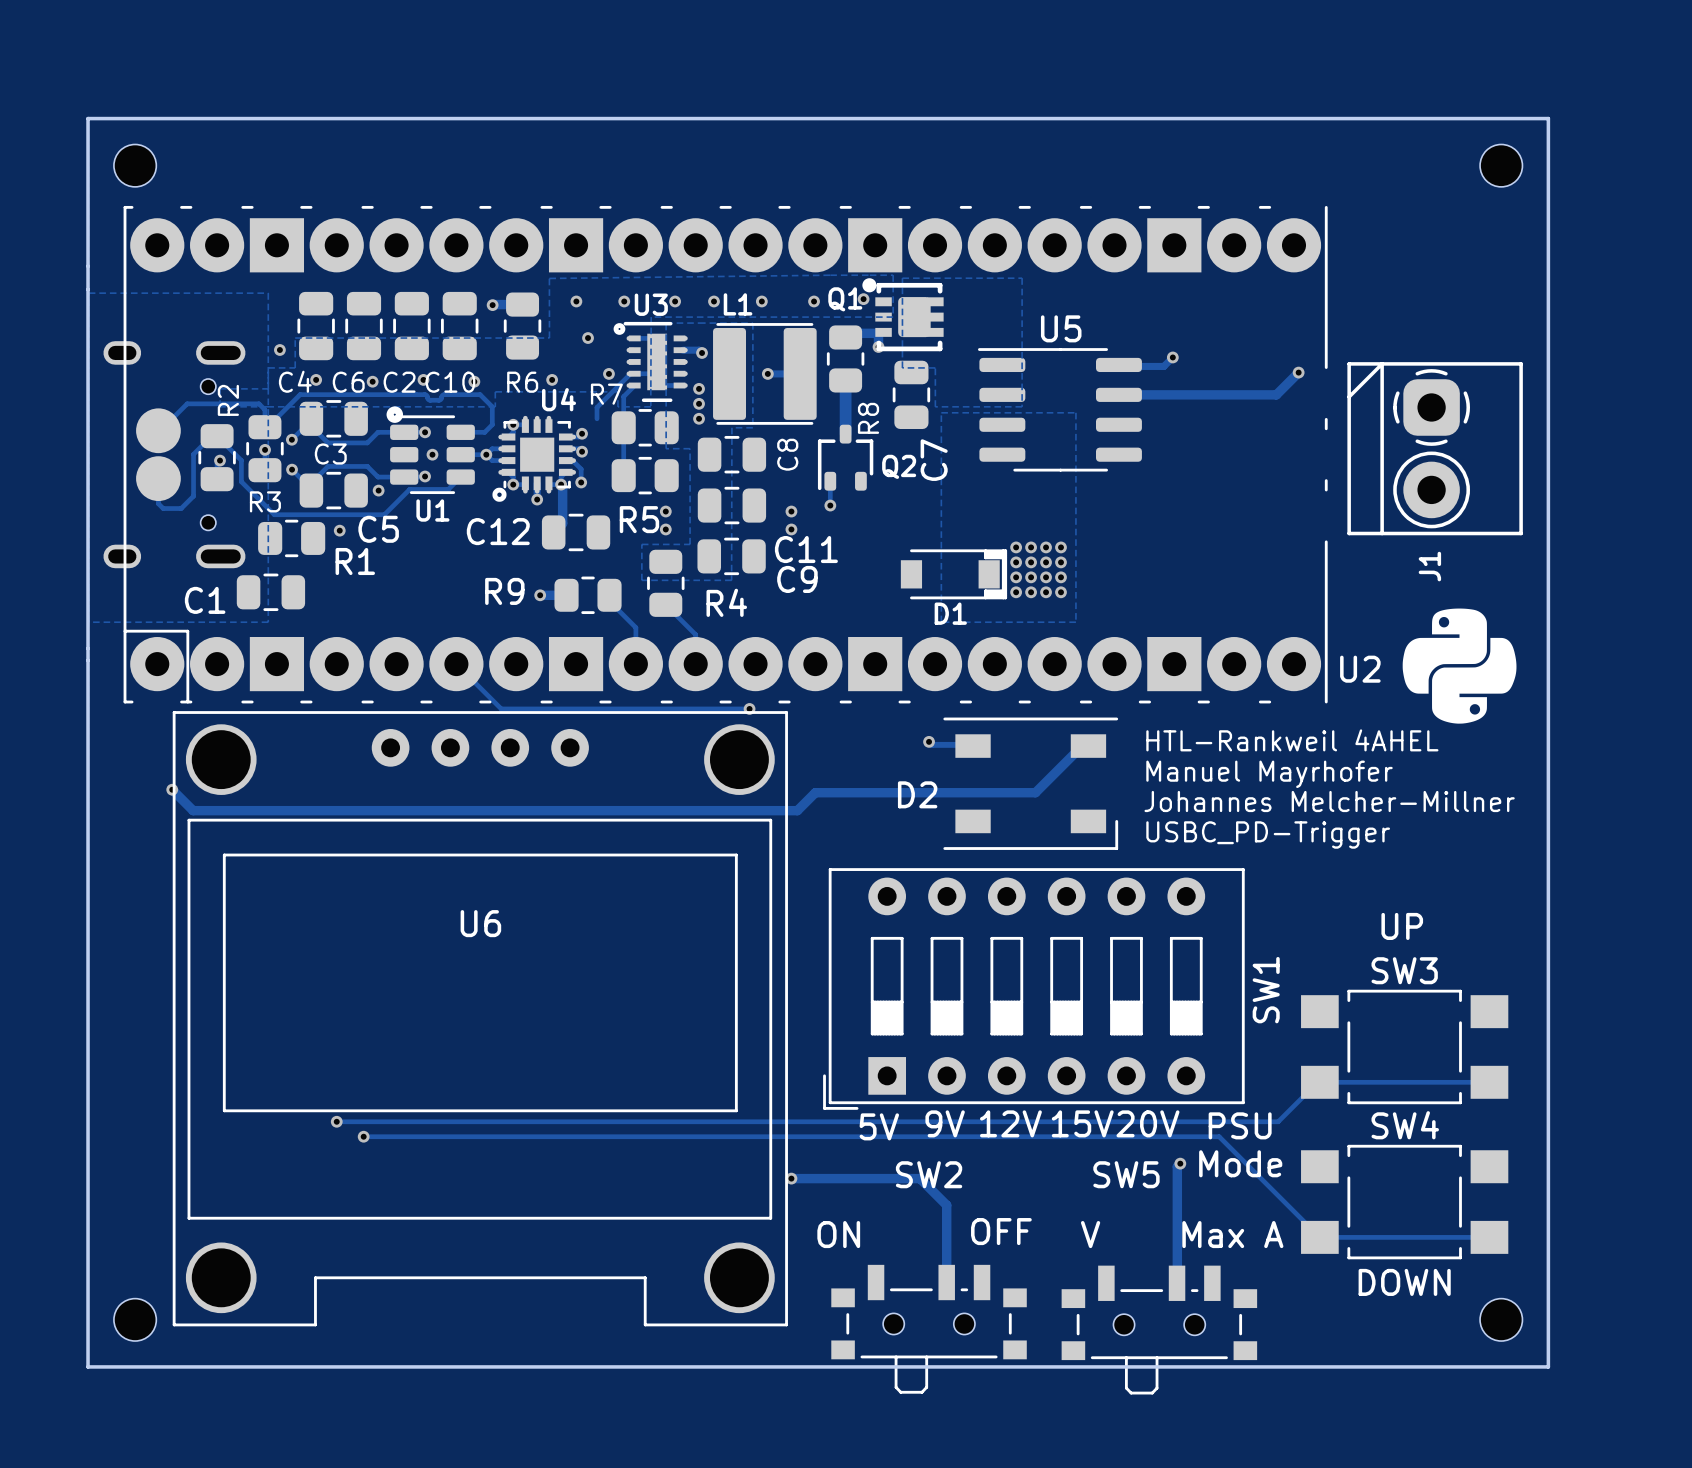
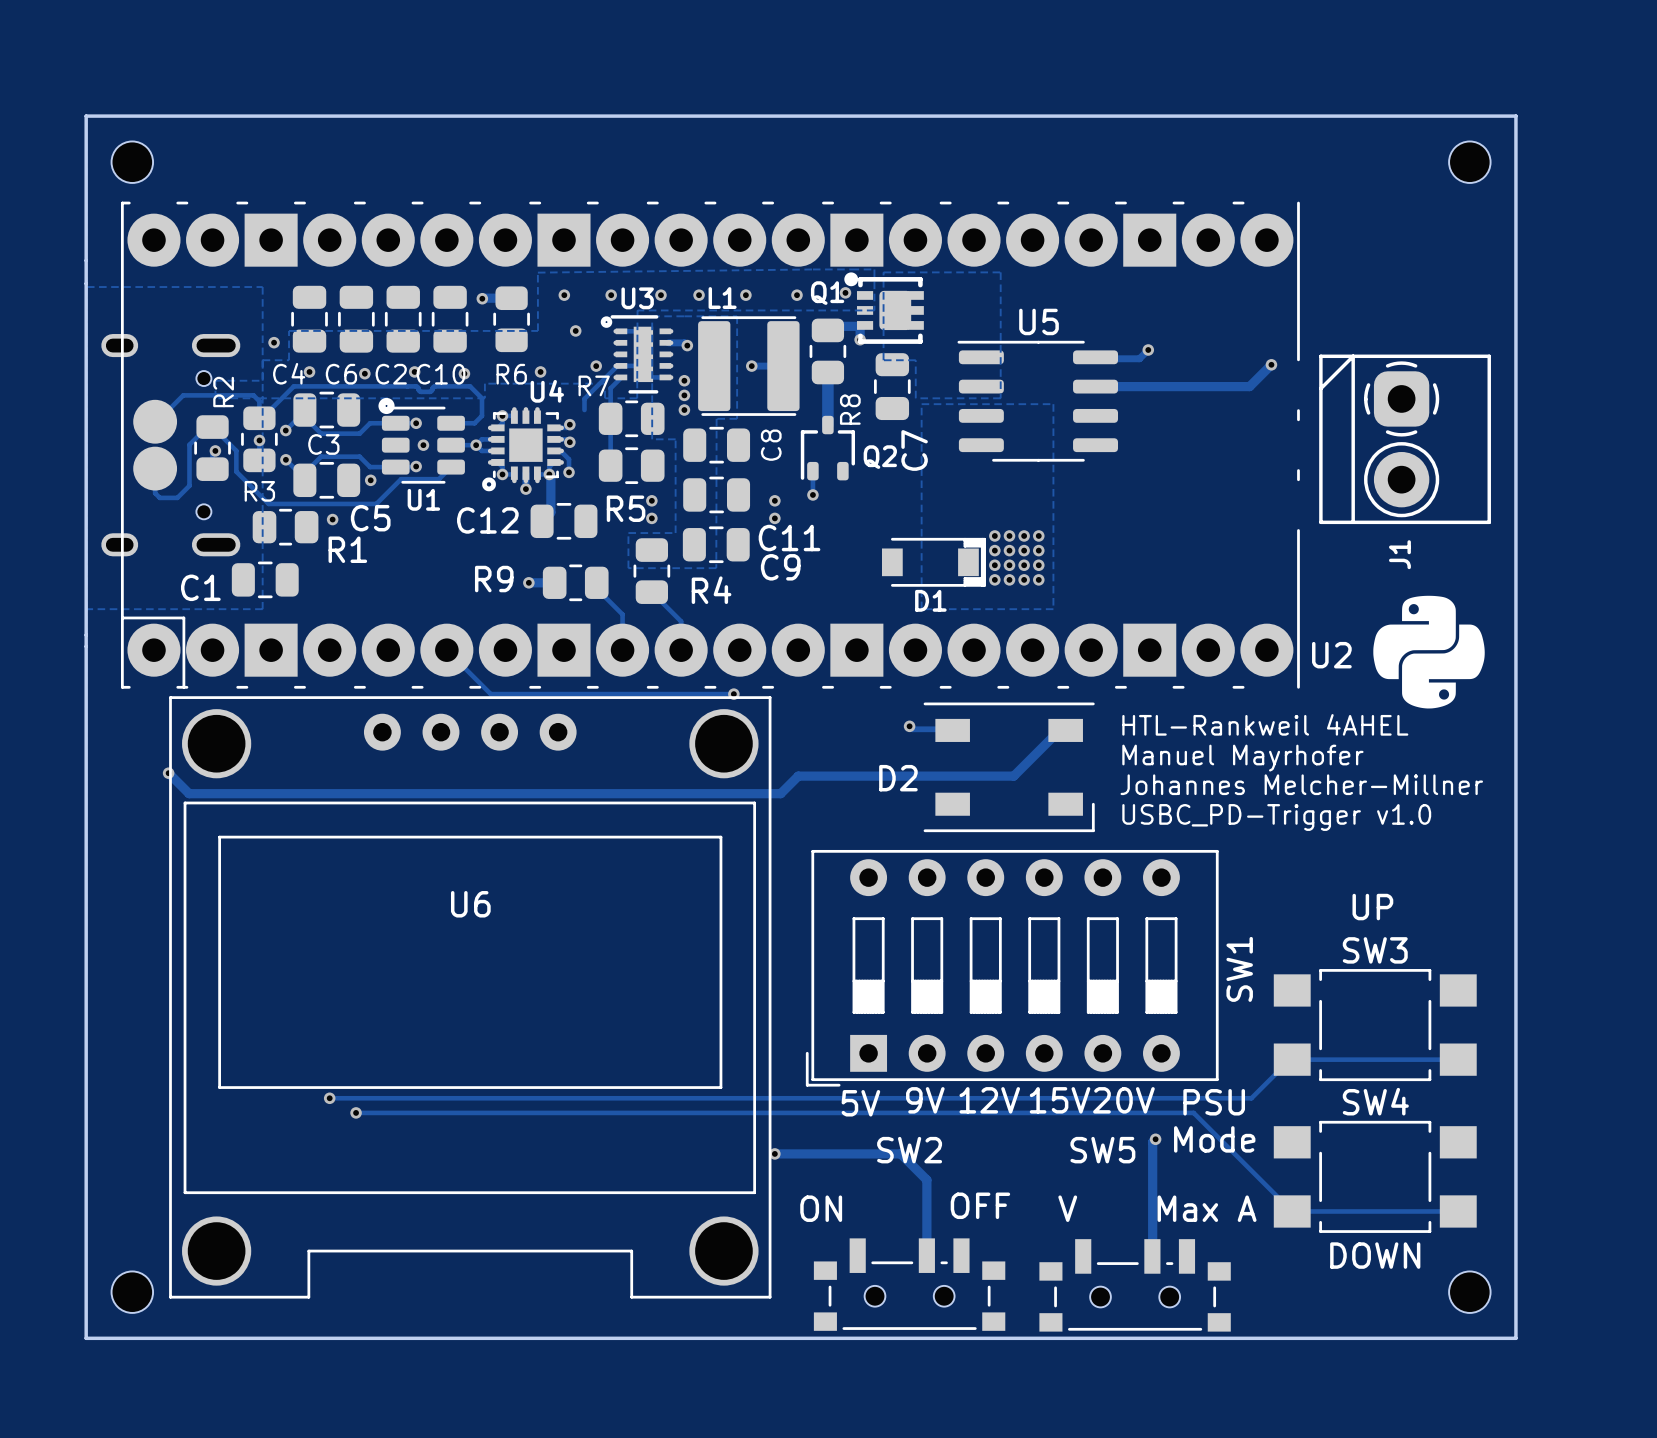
text: USBC_PD-Trigger (1268, 834) -> USBC_PD-Trigger v1.0 (1276, 817)
SW2 footprint: [831, 1264, 1027, 1394] -> [813, 1238, 1006, 1331]
SW5 footprint: [1061, 1265, 1258, 1395] -> [1039, 1239, 1231, 1332]

